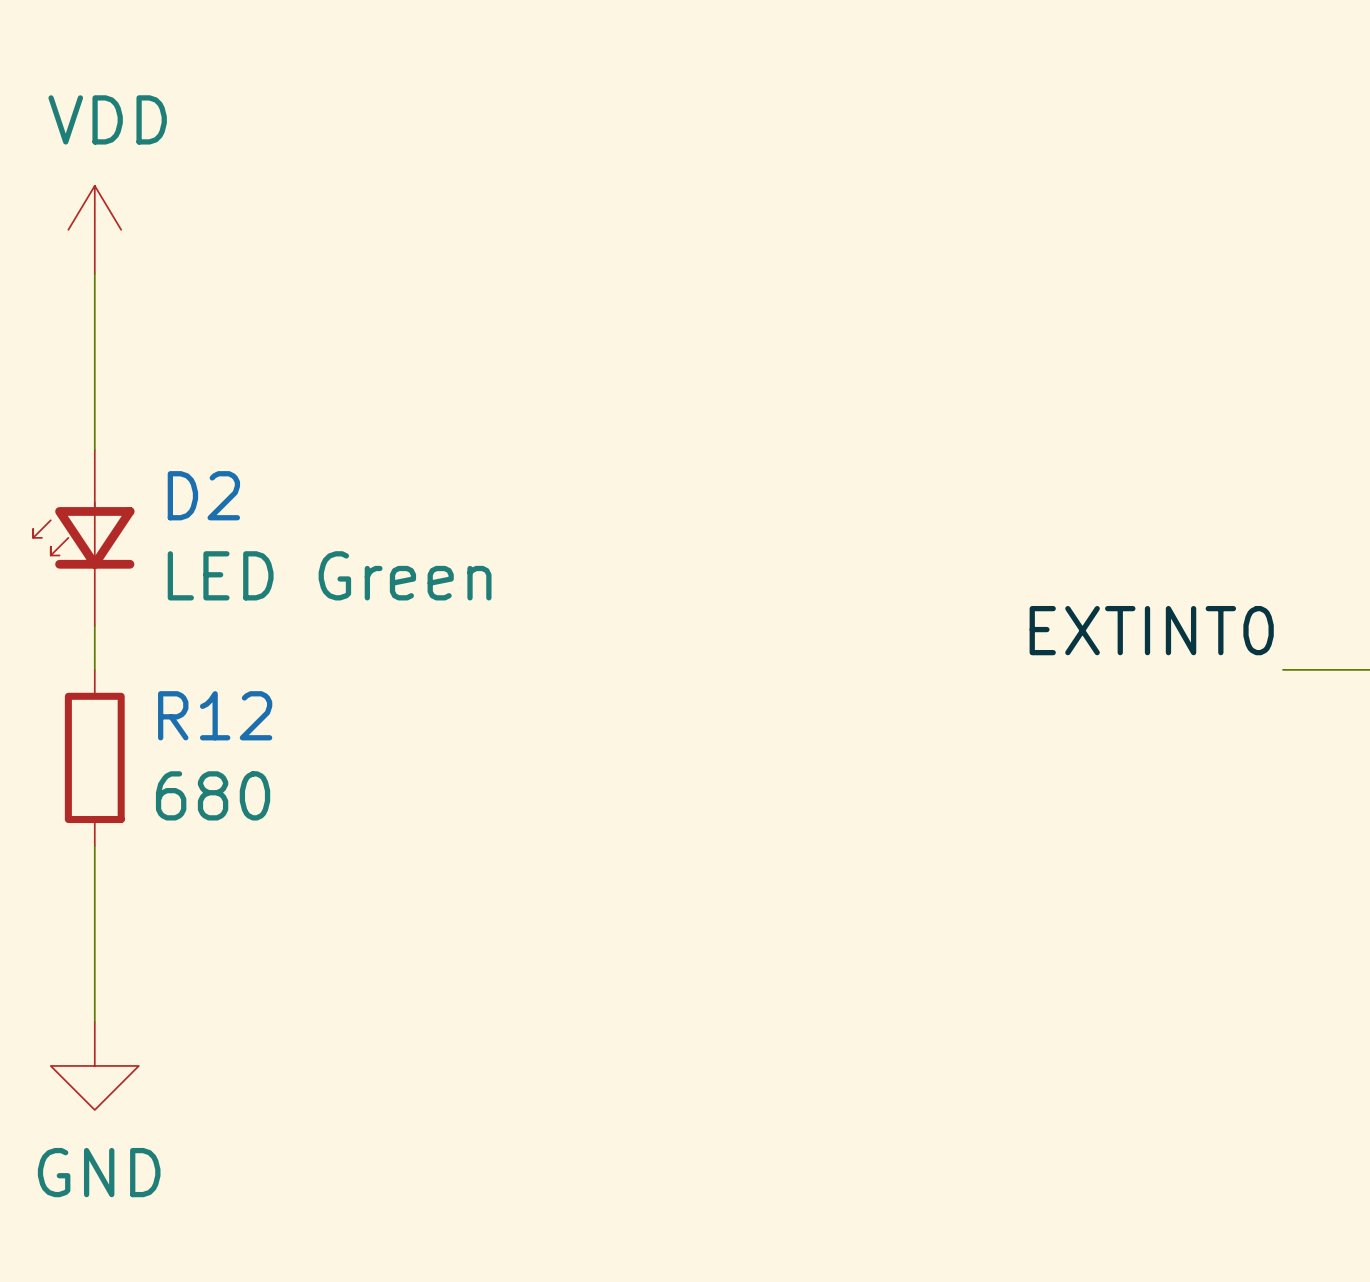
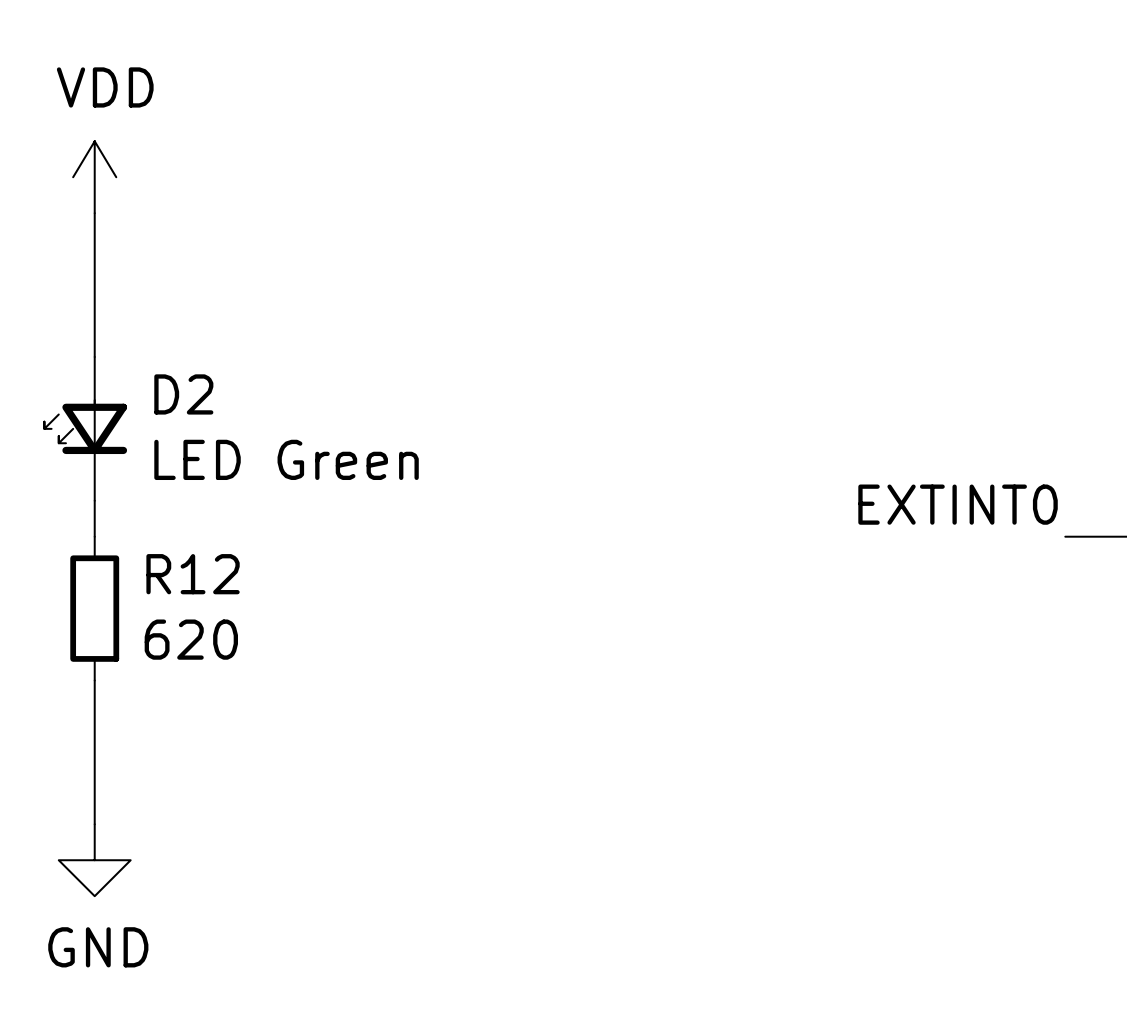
R12 value: 680 (213, 795) -> 620 (191, 639)

